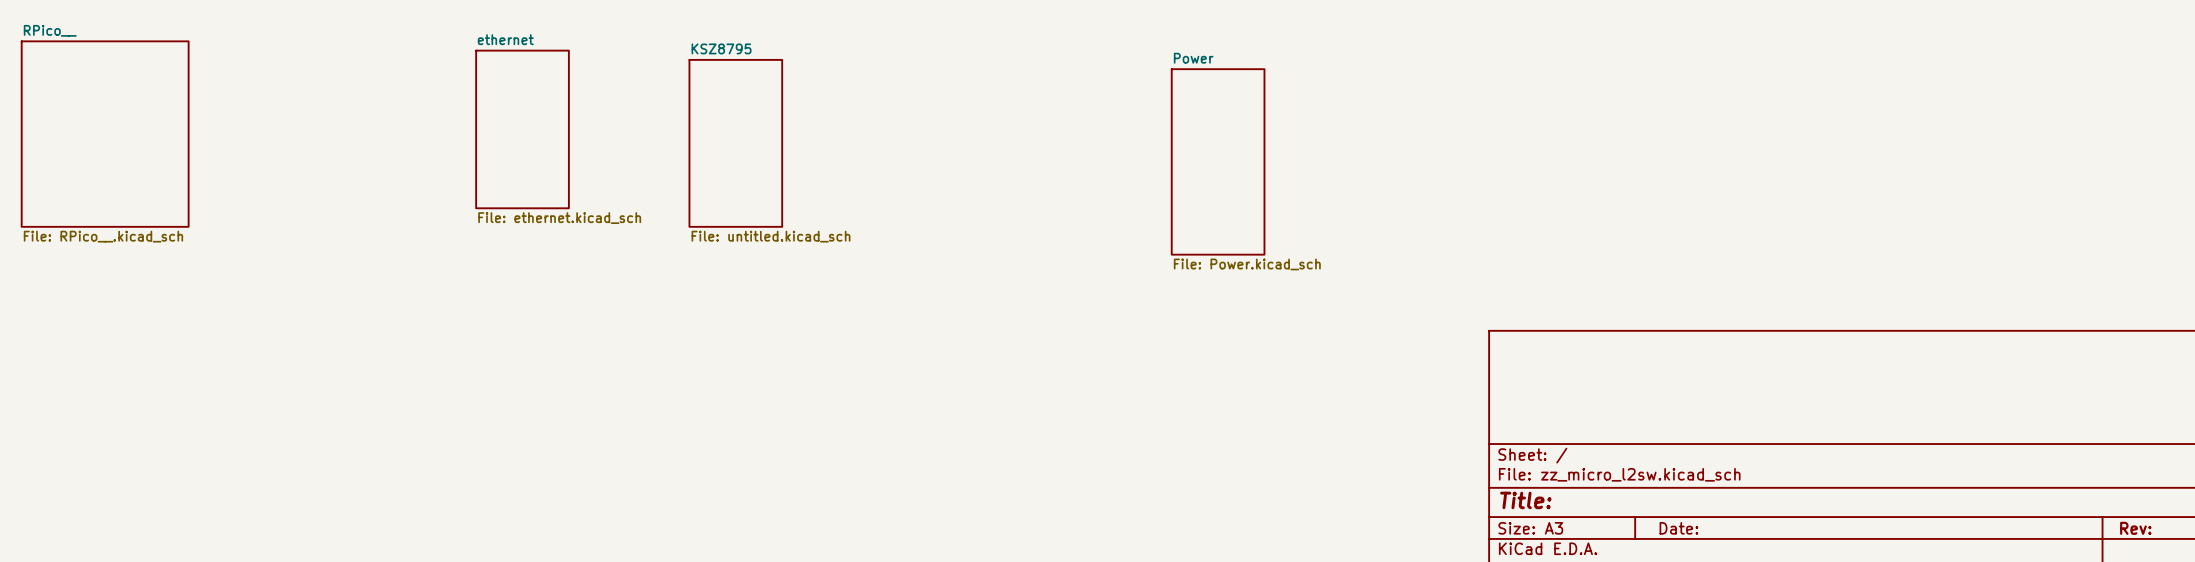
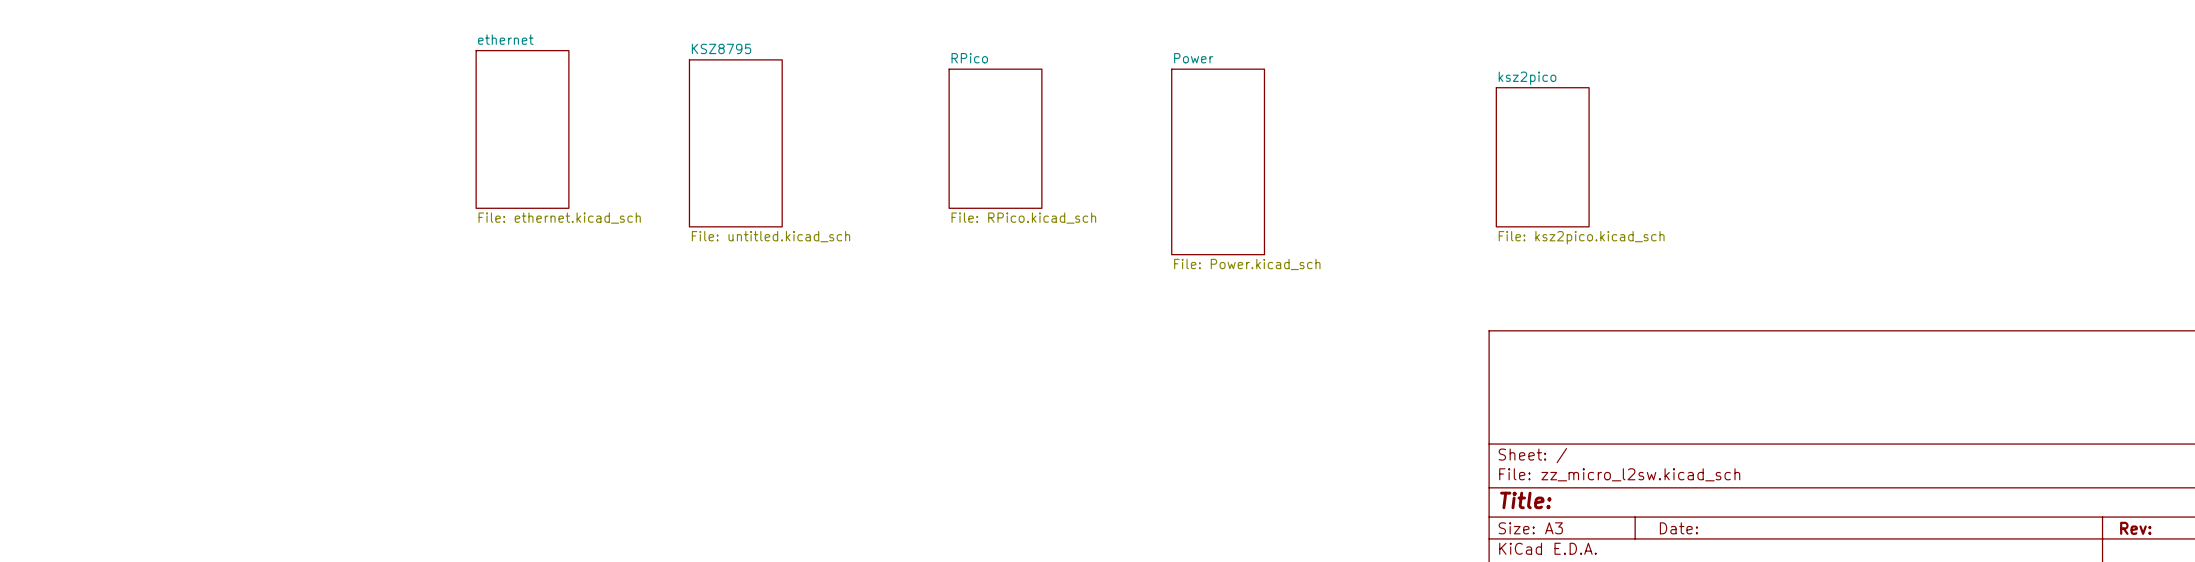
sheet RPico__: File: RPico__.kicad_sch (105, 134) -> none
sheet RPico: none -> File: RPico.kicad_sch (995, 138)
sheet ksz2pico: none -> File: ksz2pico.kicad_sch (1542, 157)

